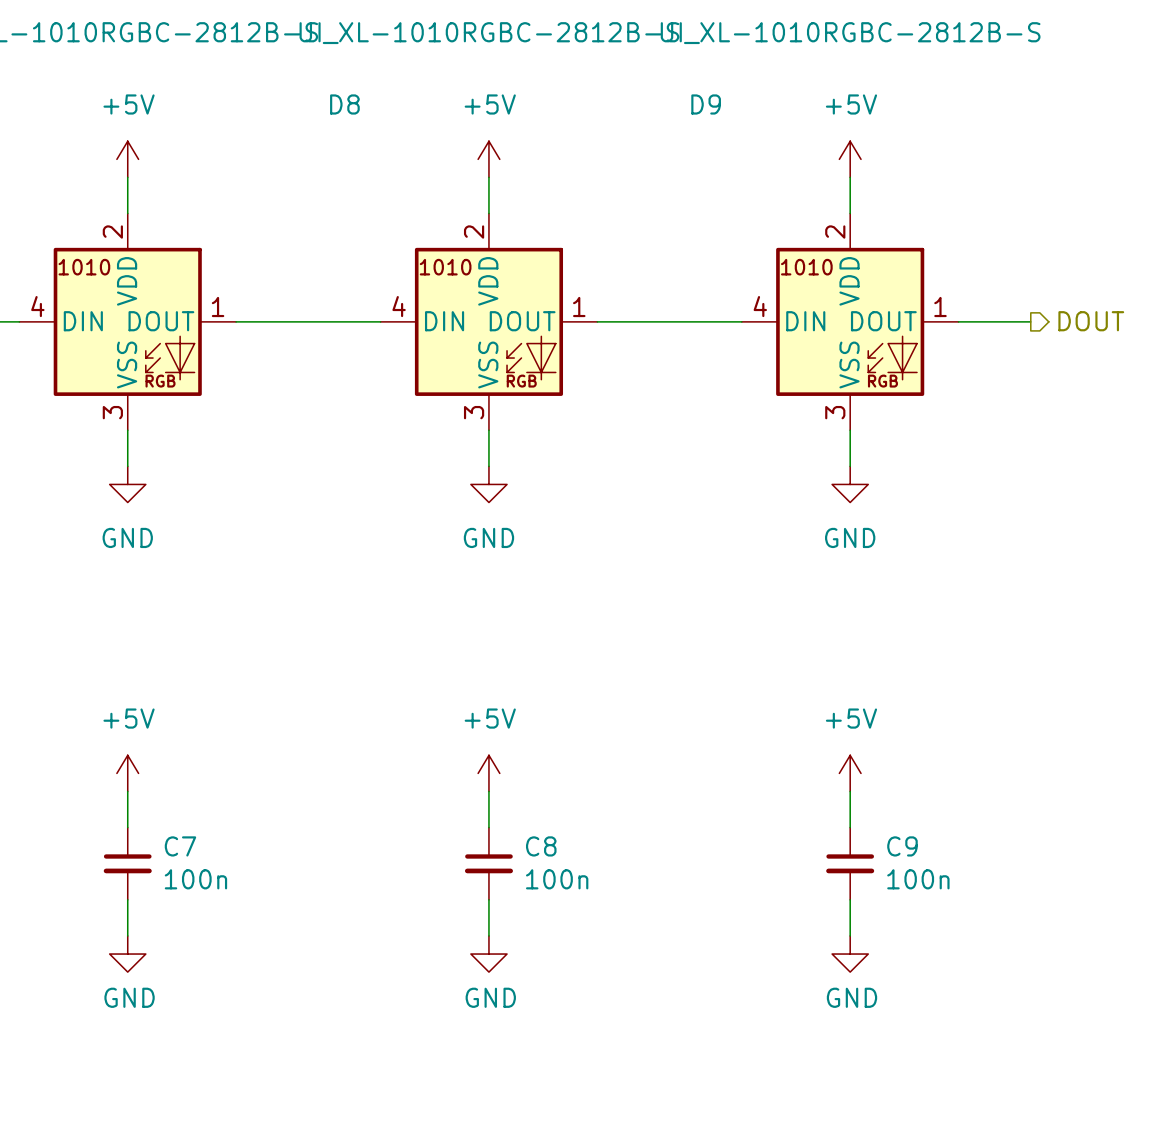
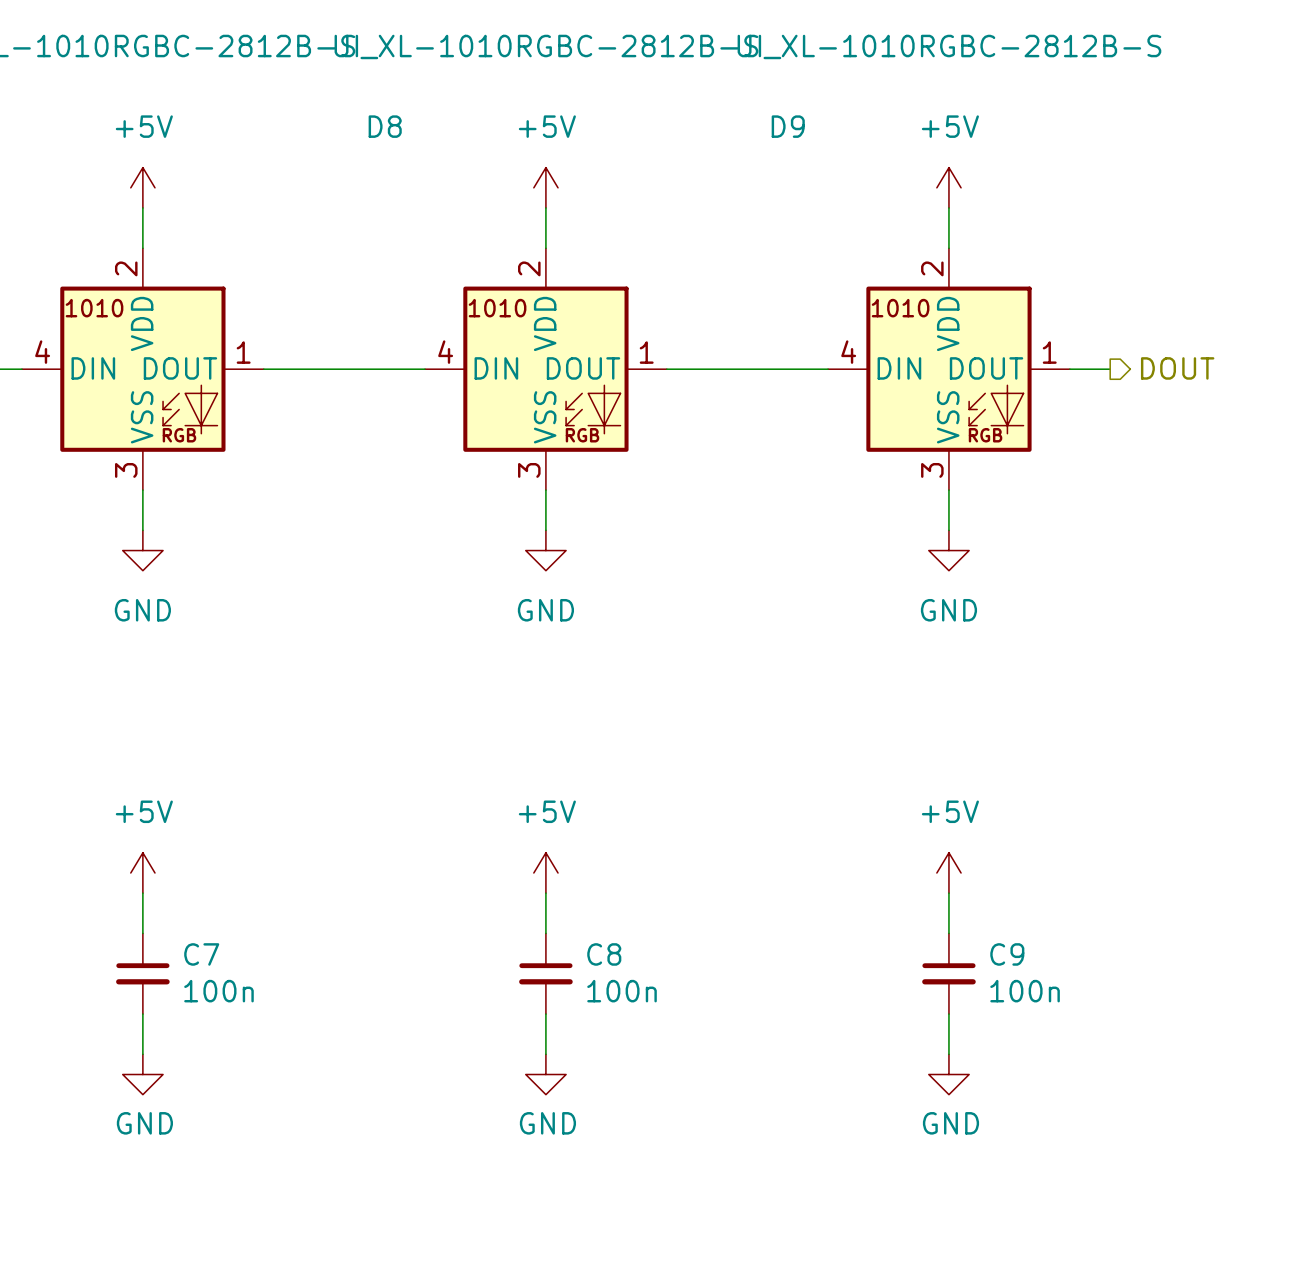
wire: (994, 321) (1030, 321) -> none
hierarchical label position: DOUT (1091, 321) -> DOUT (1177, 368)

